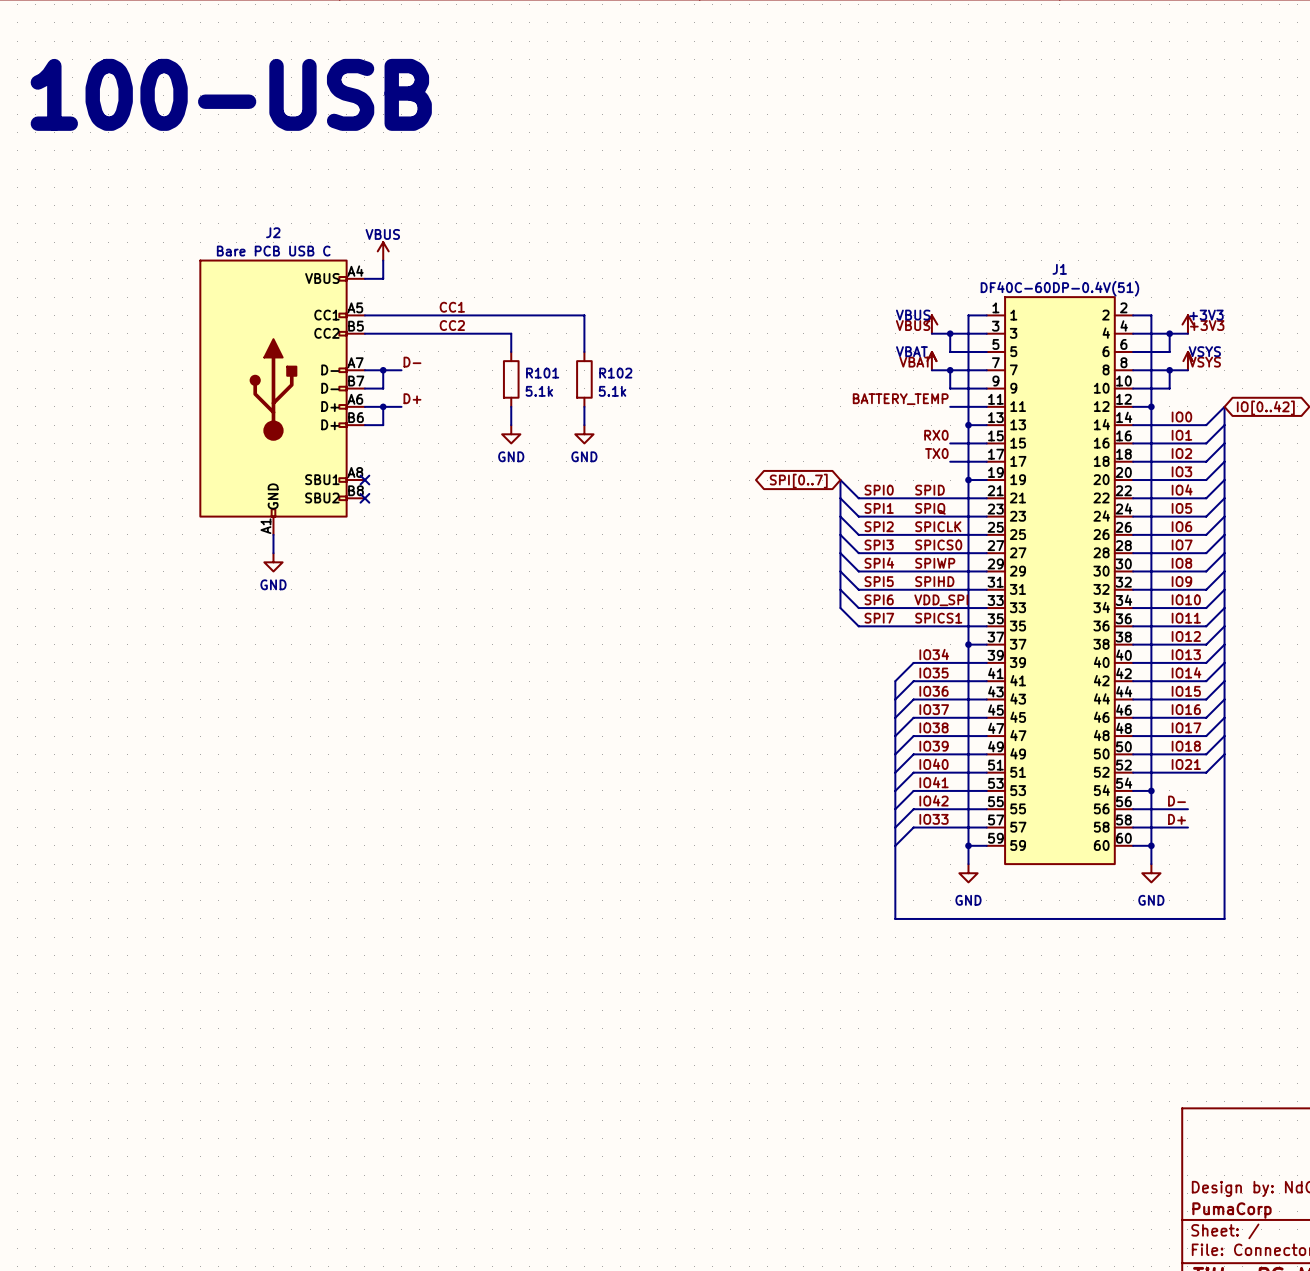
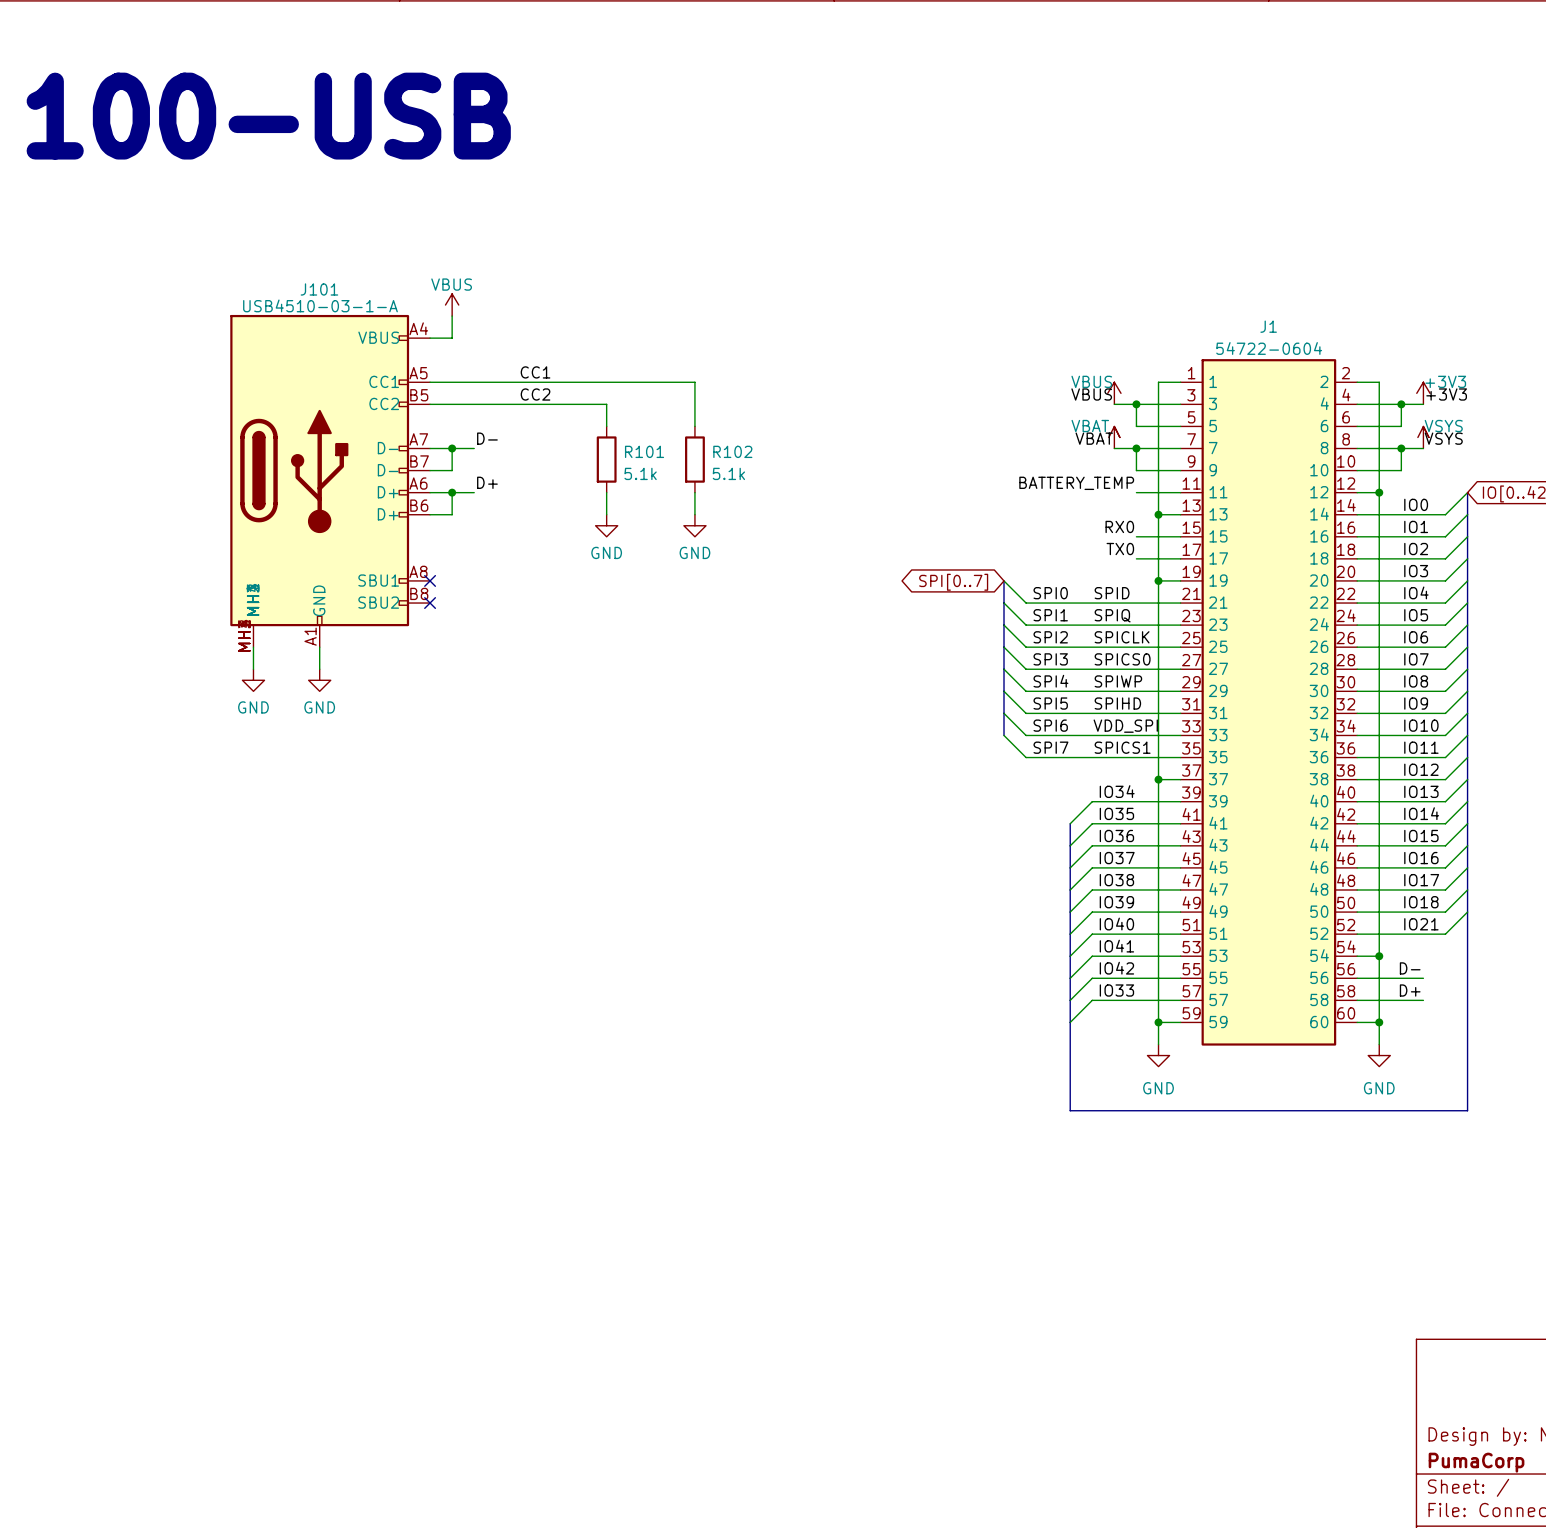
J1 value: DF40C-60DP-0.4V(51) (1059, 288) -> 54722-0604 (1269, 348)
J2: Bare PCB USB C (282, 397) -> none
J101: none -> USB4510-03-1-A (330, 481)
wire: none -> (253, 647) (253, 669)
power symbol: none -> GND (253, 680)

